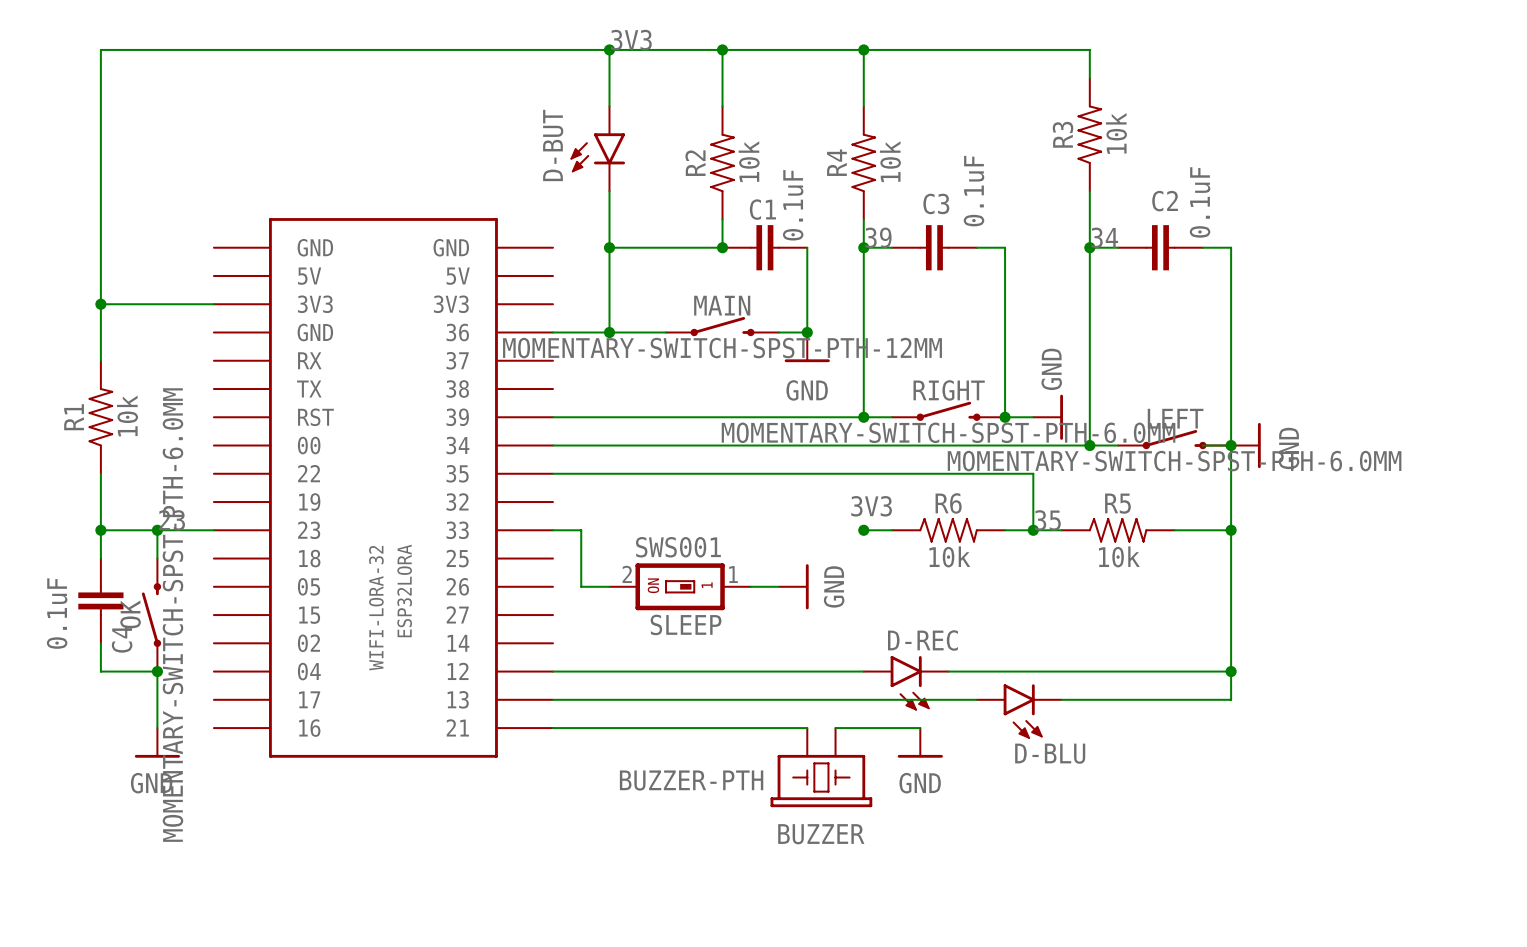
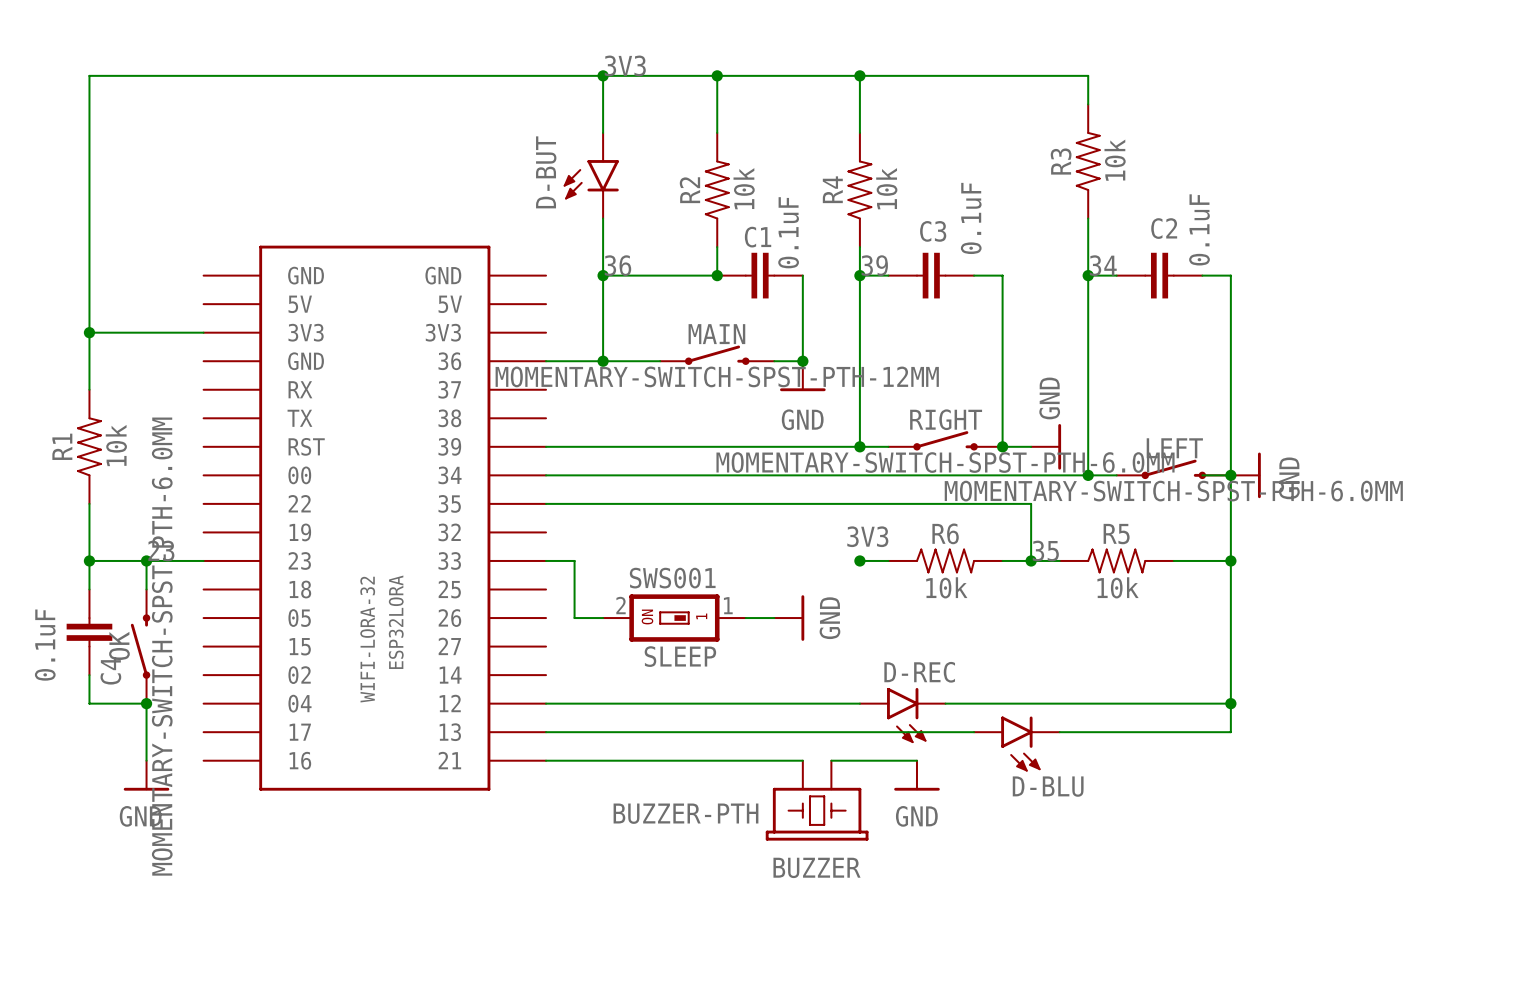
label: none -> 36 (617, 265)

